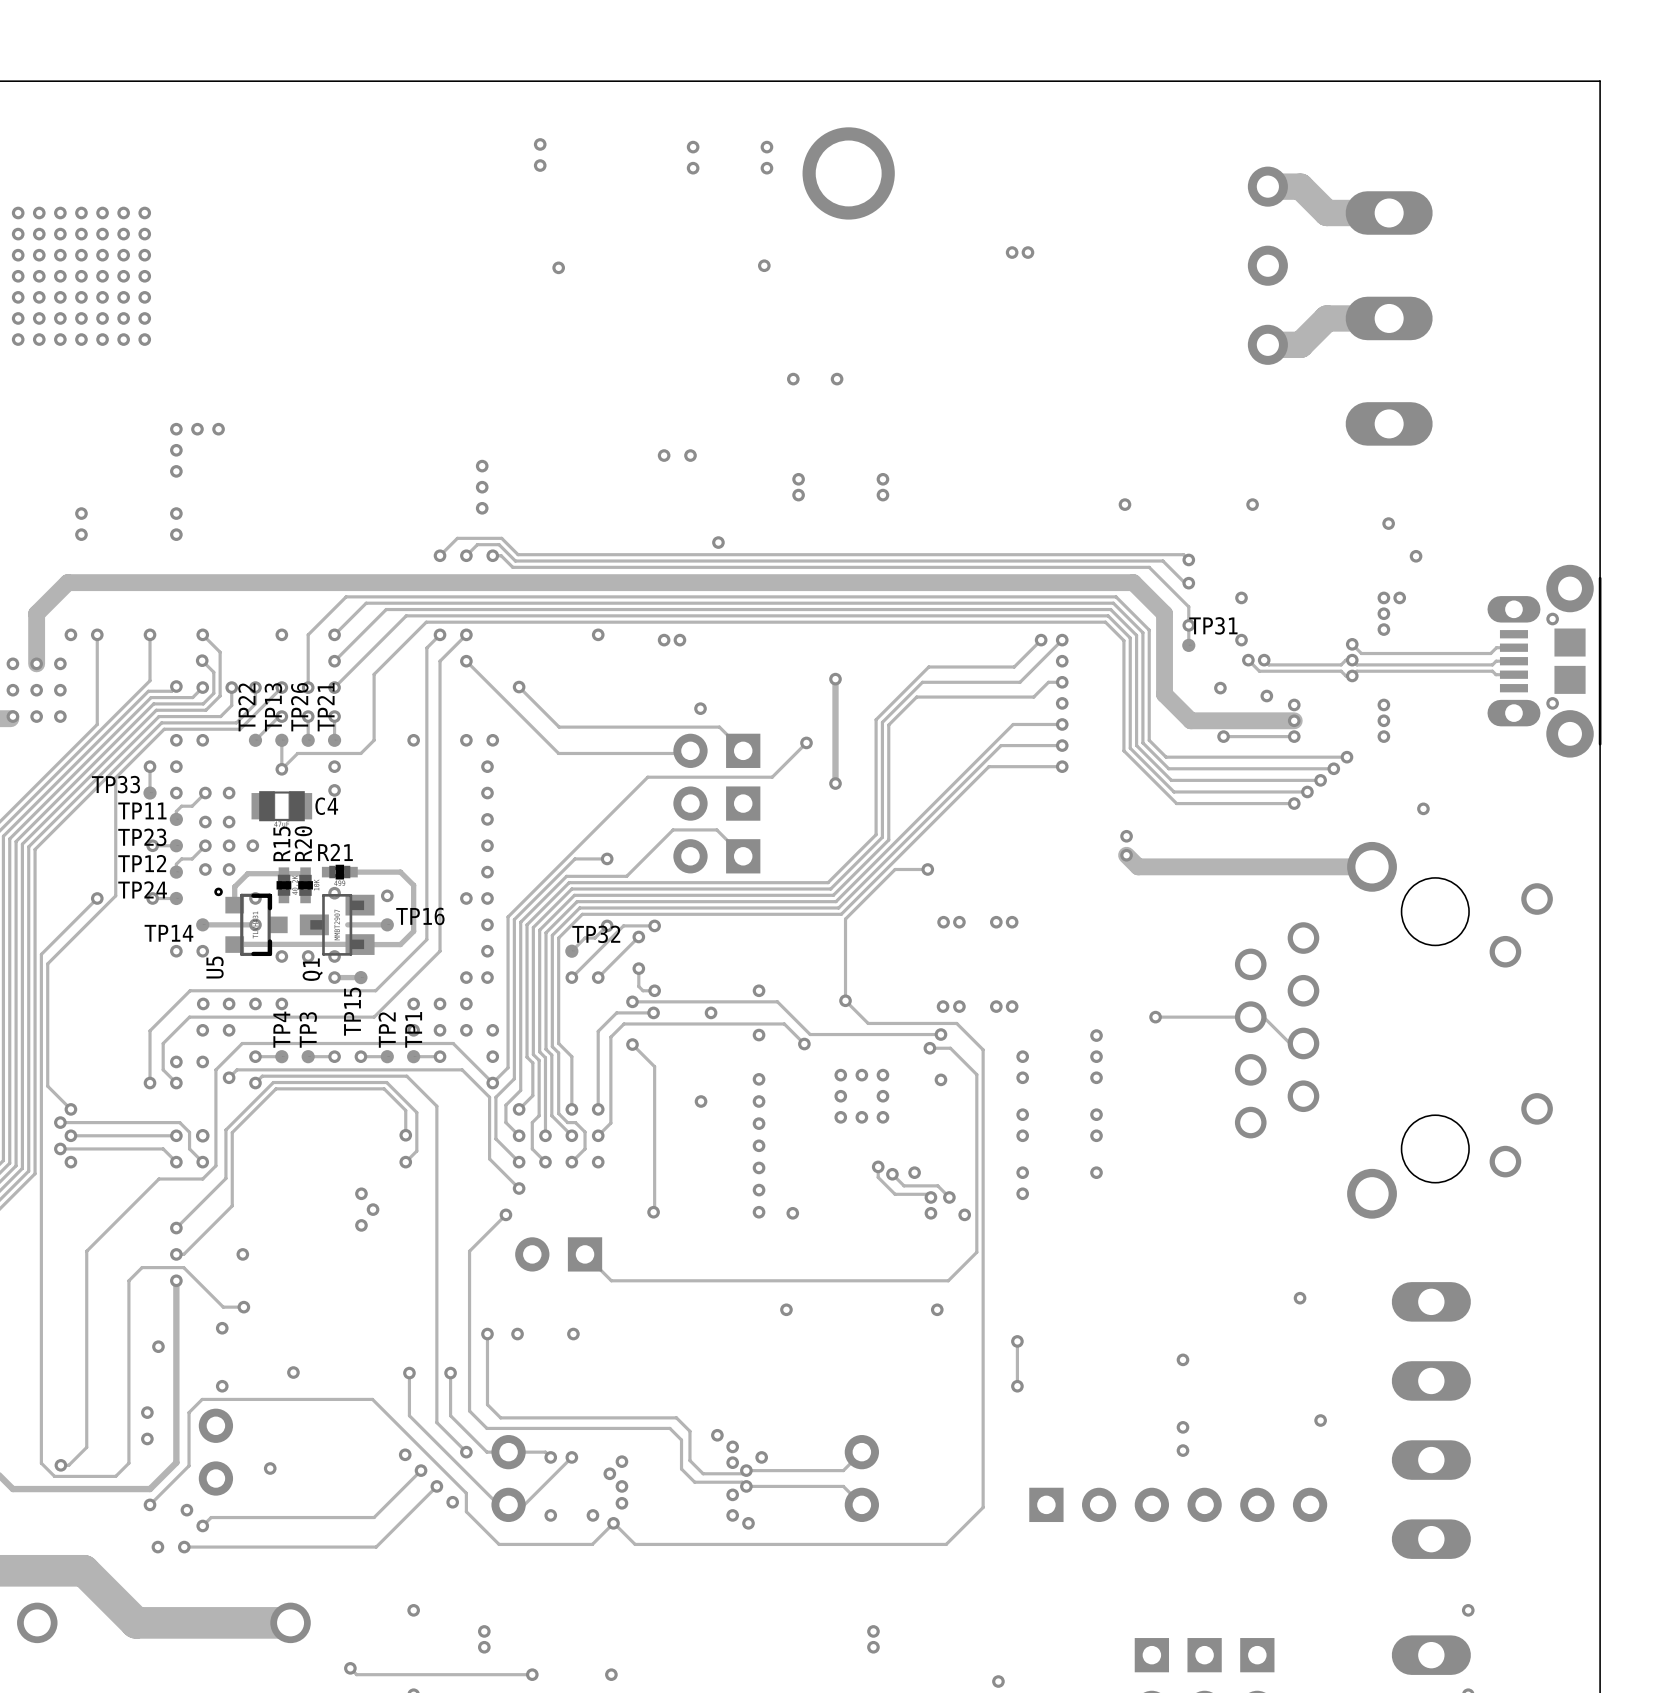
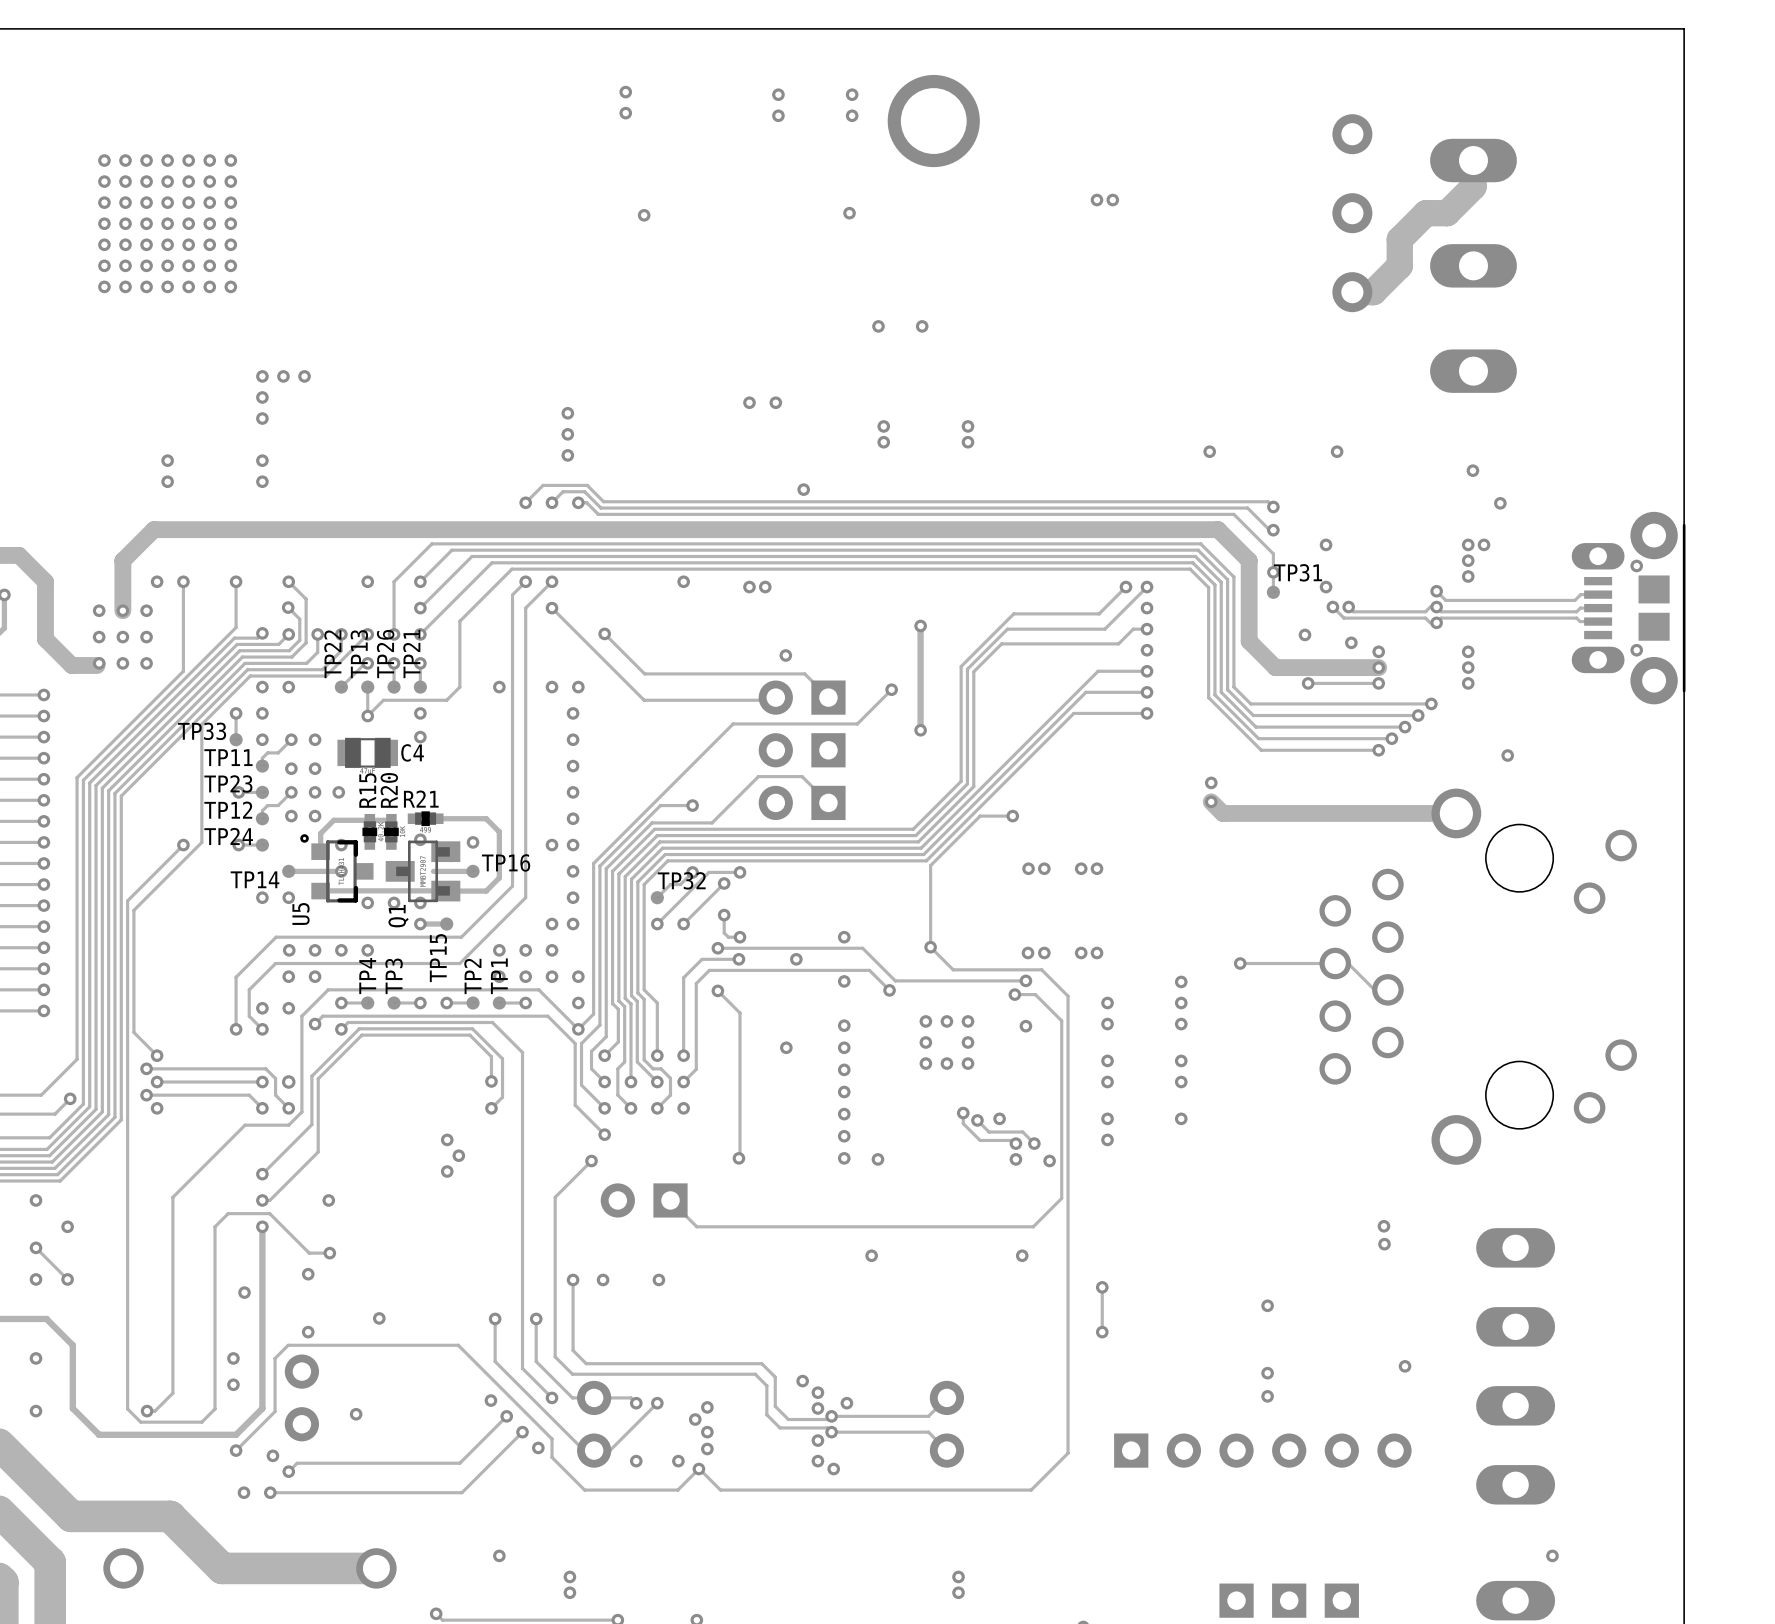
track: (1267, 186) (1300, 186) (1326, 213) (1389, 213) -> none
track: (1389, 318) (1326, 318) (1300, 344) (1288, 344) -> (1473, 160) (1473, 186) (1447, 213) (1426, 213) (1399, 239) (1399, 265) (1373, 292)
via: none -> (1383, 1226)

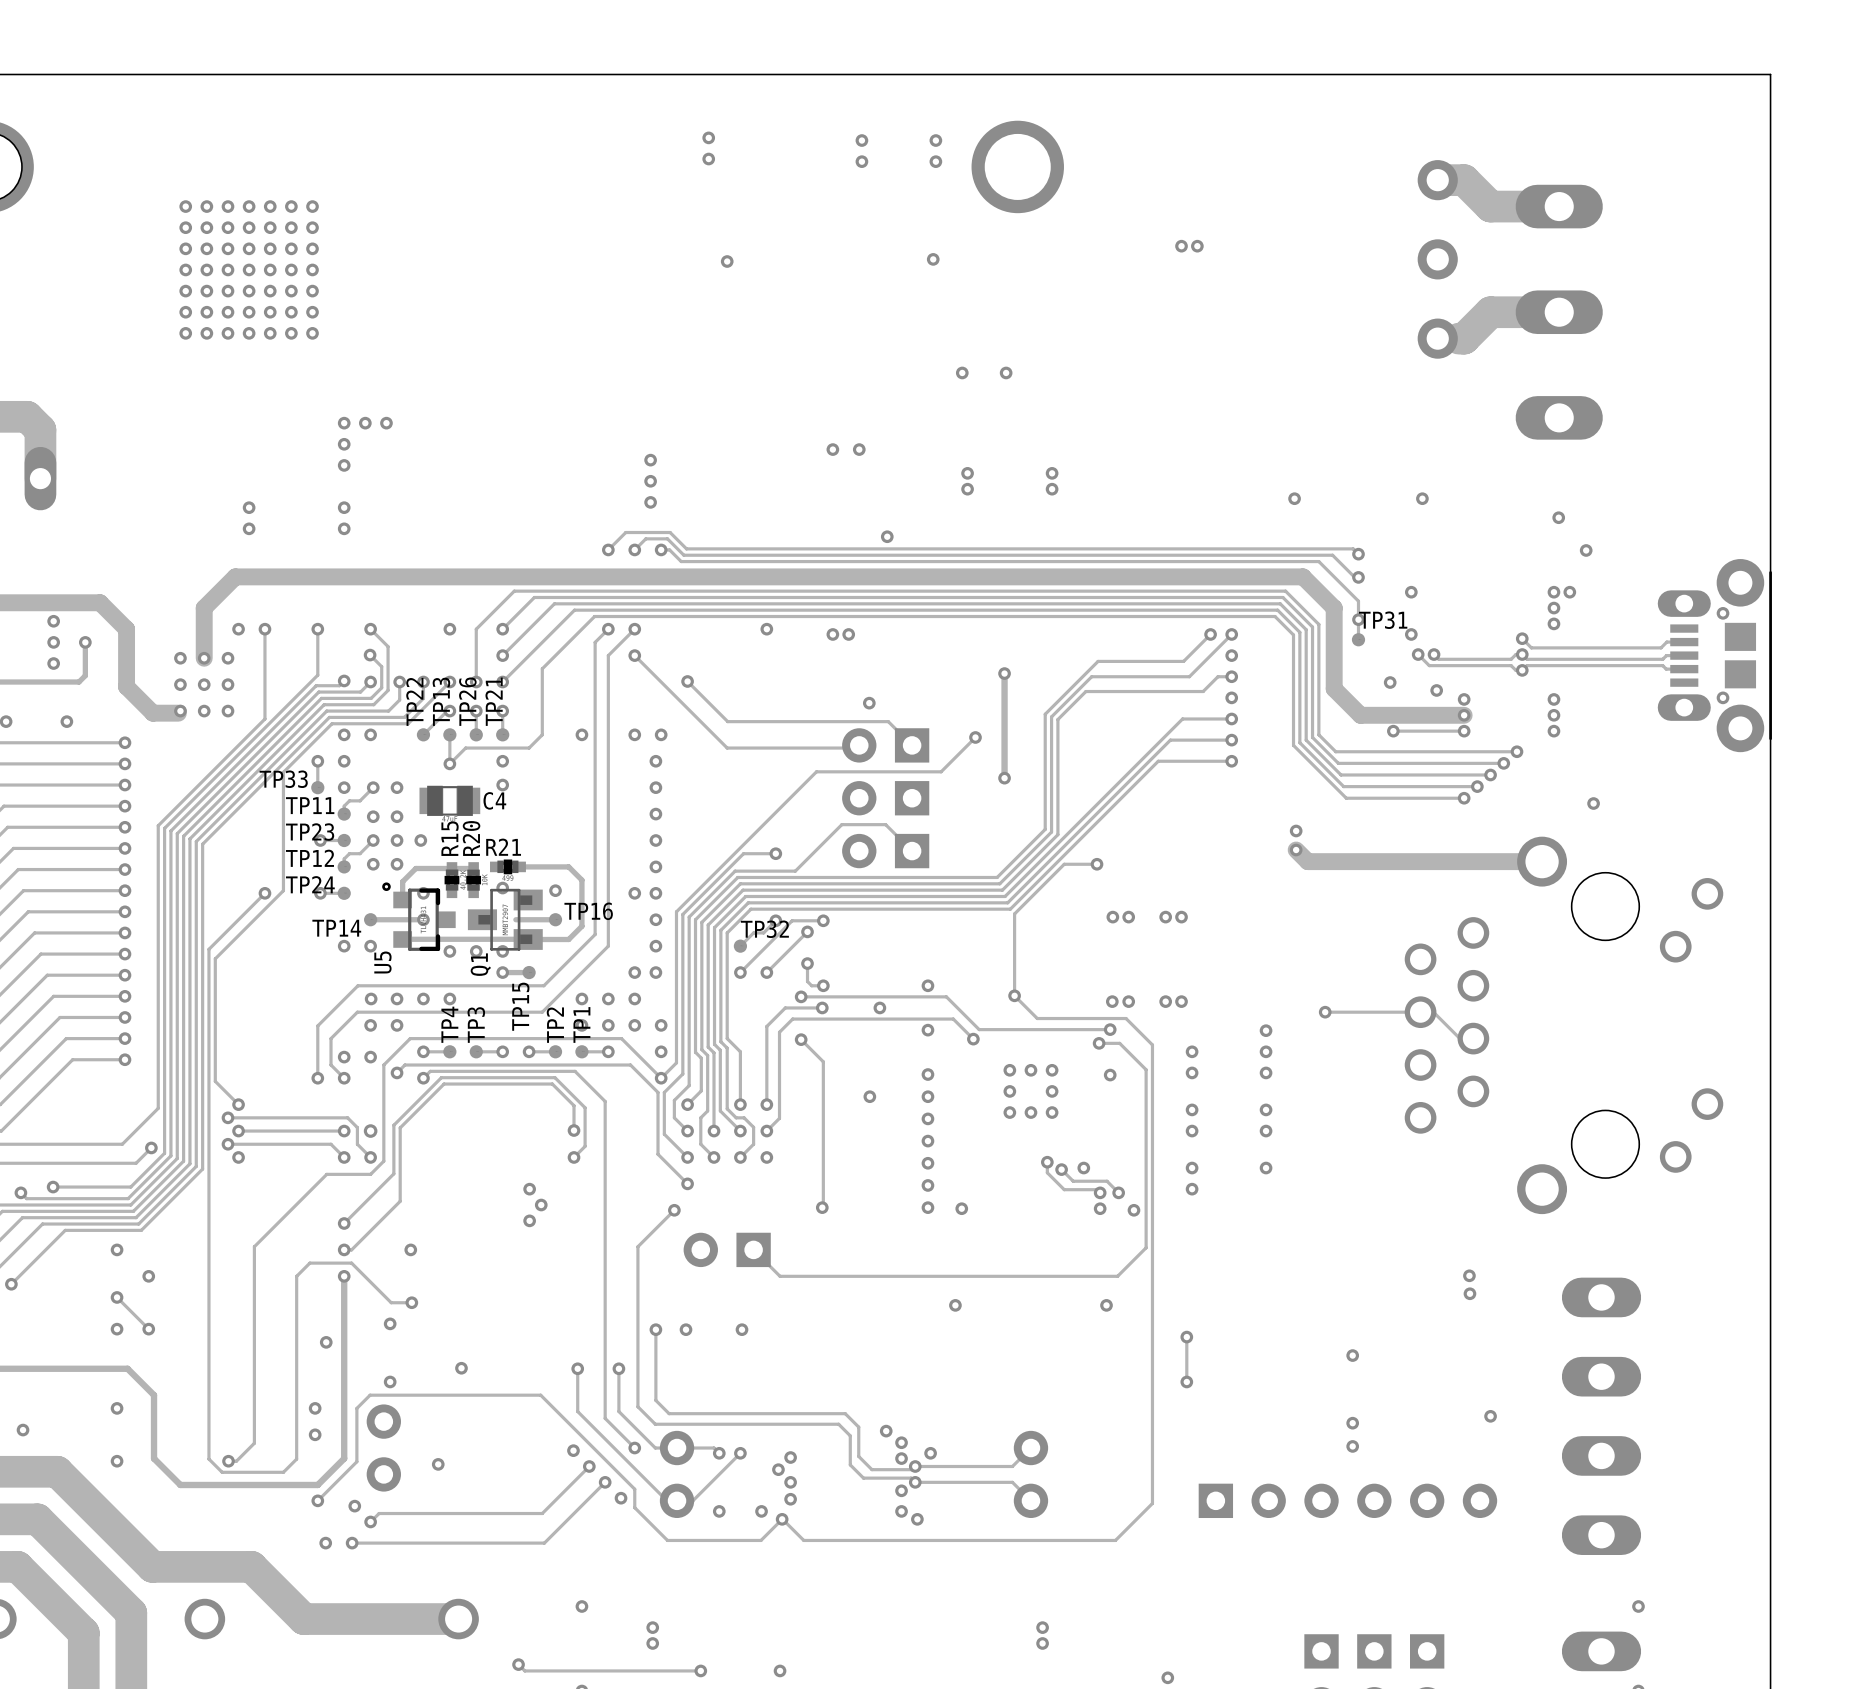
track: none -> (1437, 180) (1464, 180) (1490, 206) (1559, 206)
track: (1473, 160) (1473, 186) (1447, 213) (1426, 213) (1399, 239) (1399, 265) (1373, 292) -> (1559, 312) (1490, 312) (1464, 338) (1458, 338)

